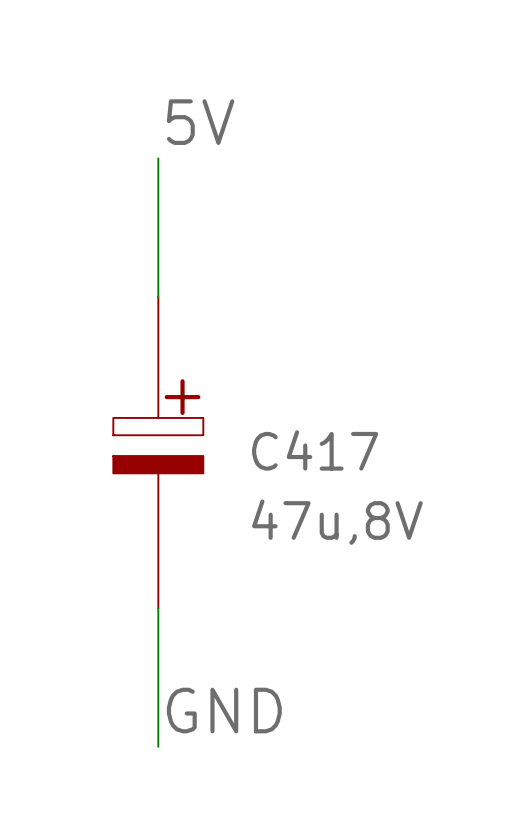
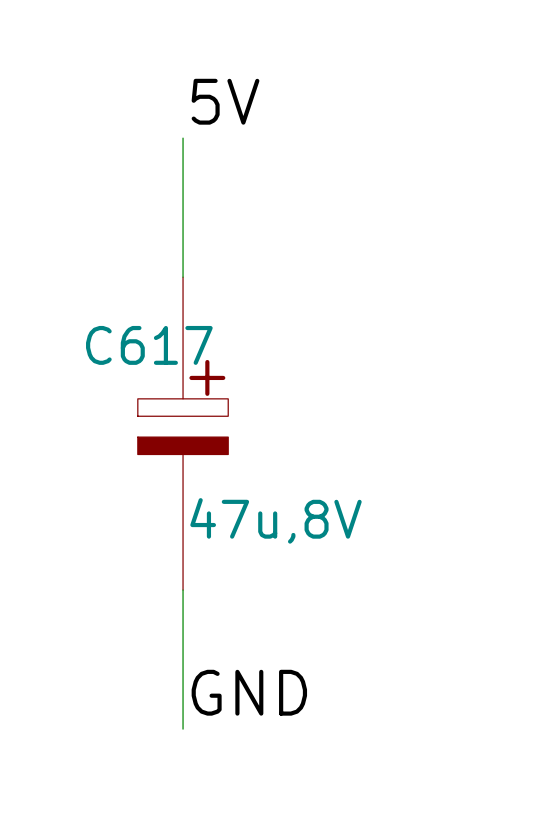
C417 name: C417 (315, 450) -> C617 (149, 345)
C417 value position: 47u,8V (337, 522) -> 47u,8V (275, 520)

